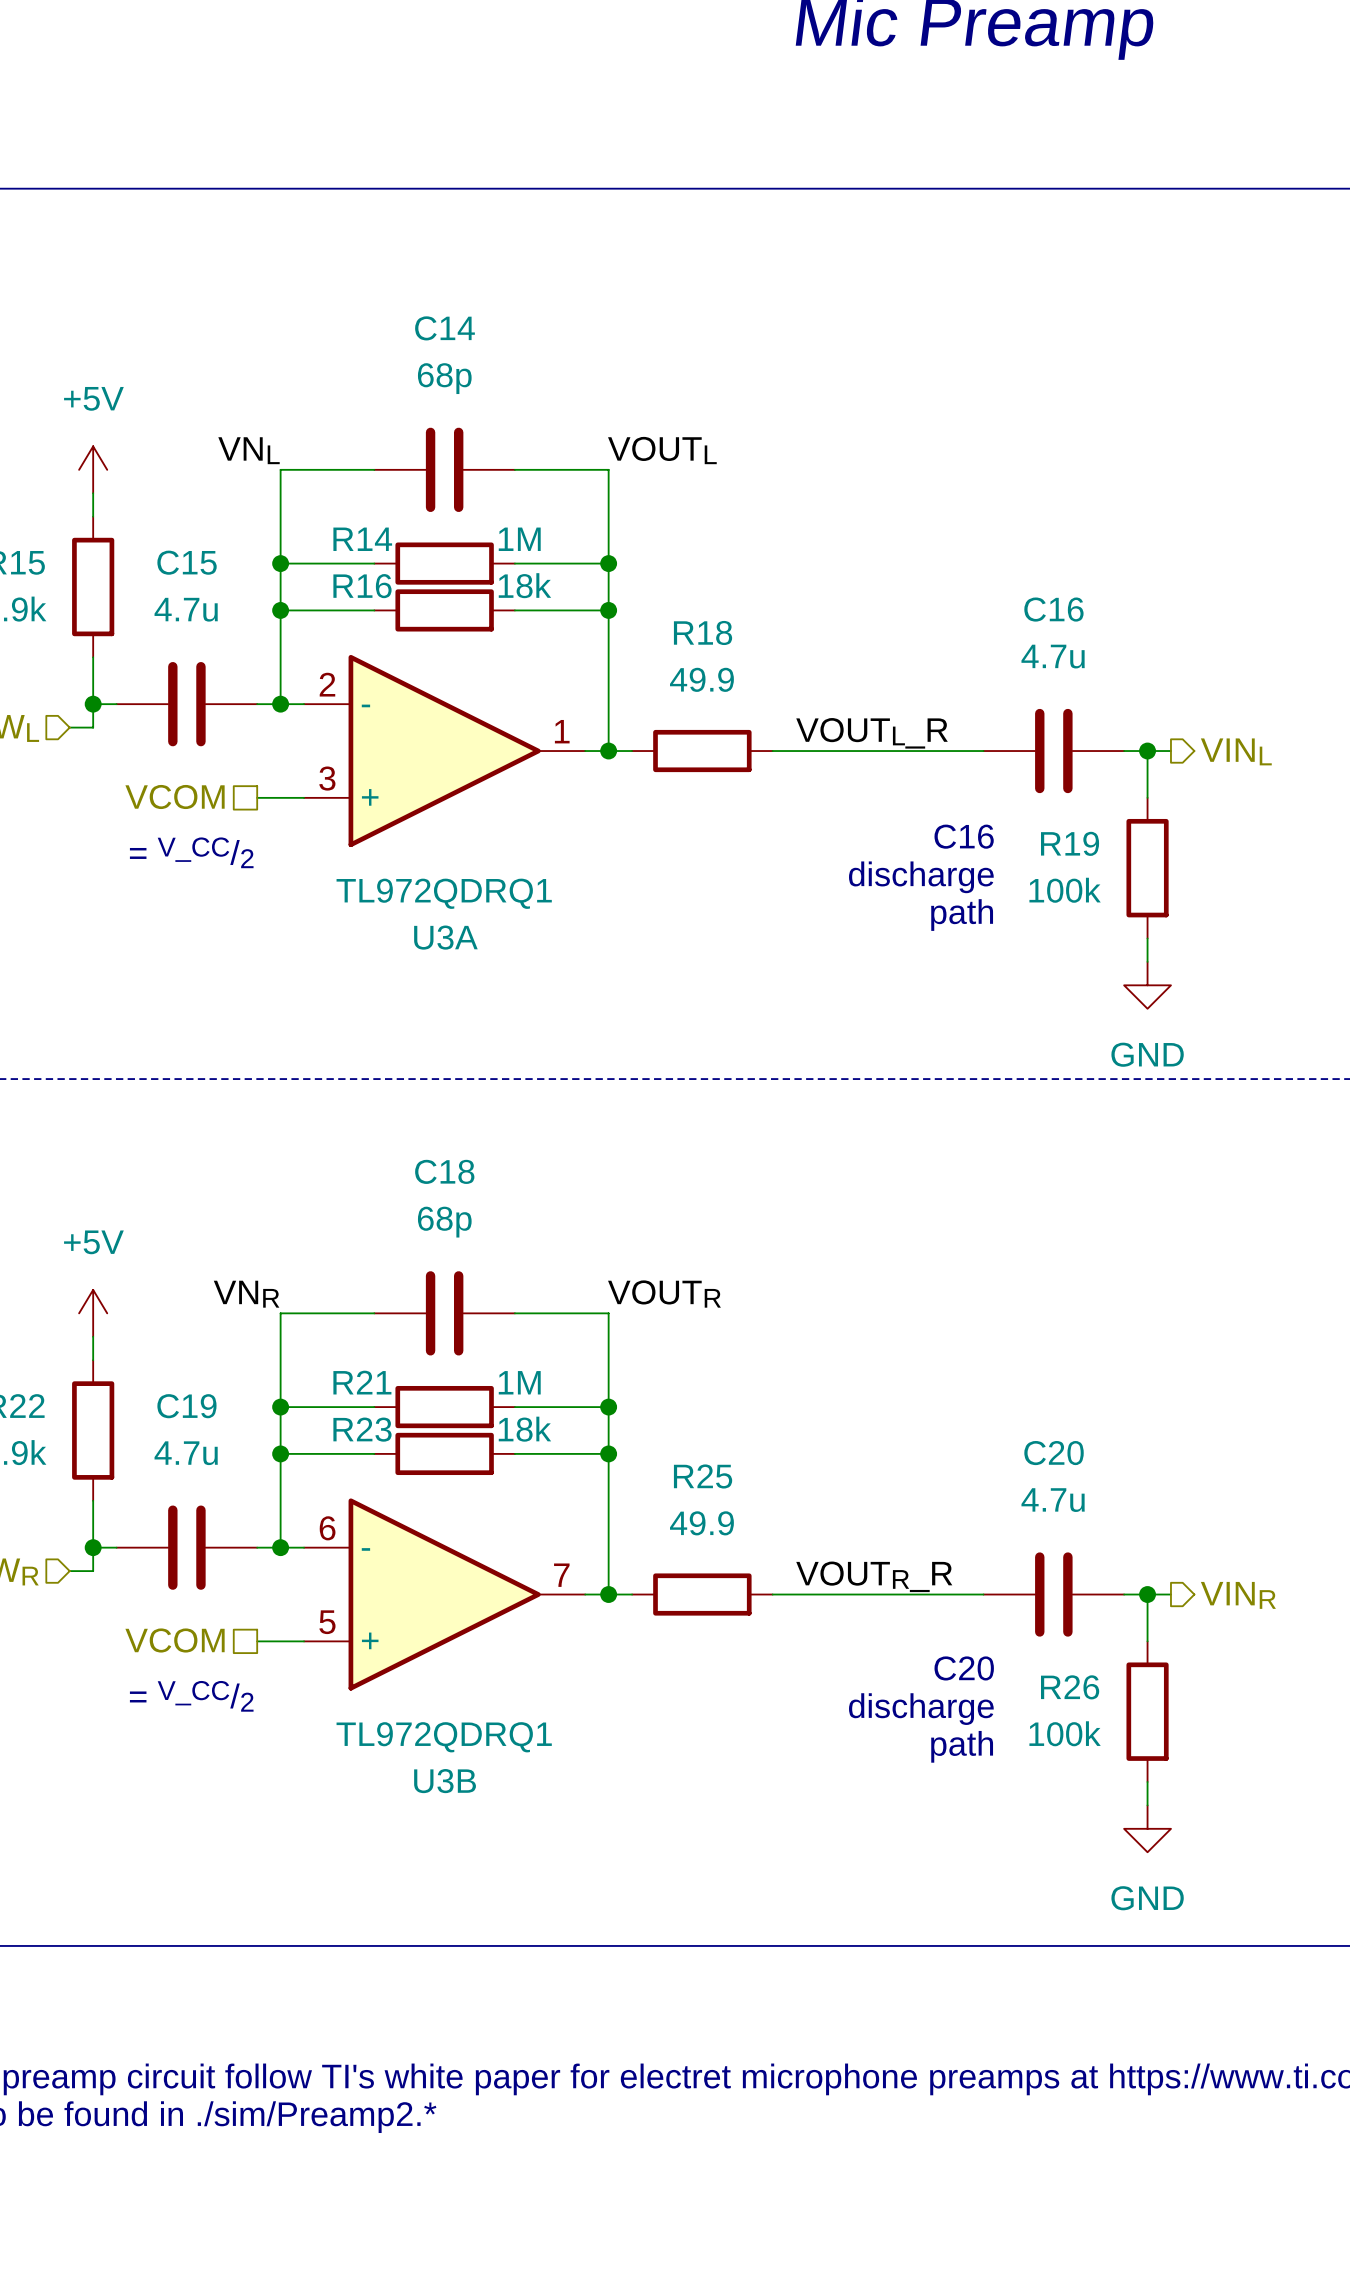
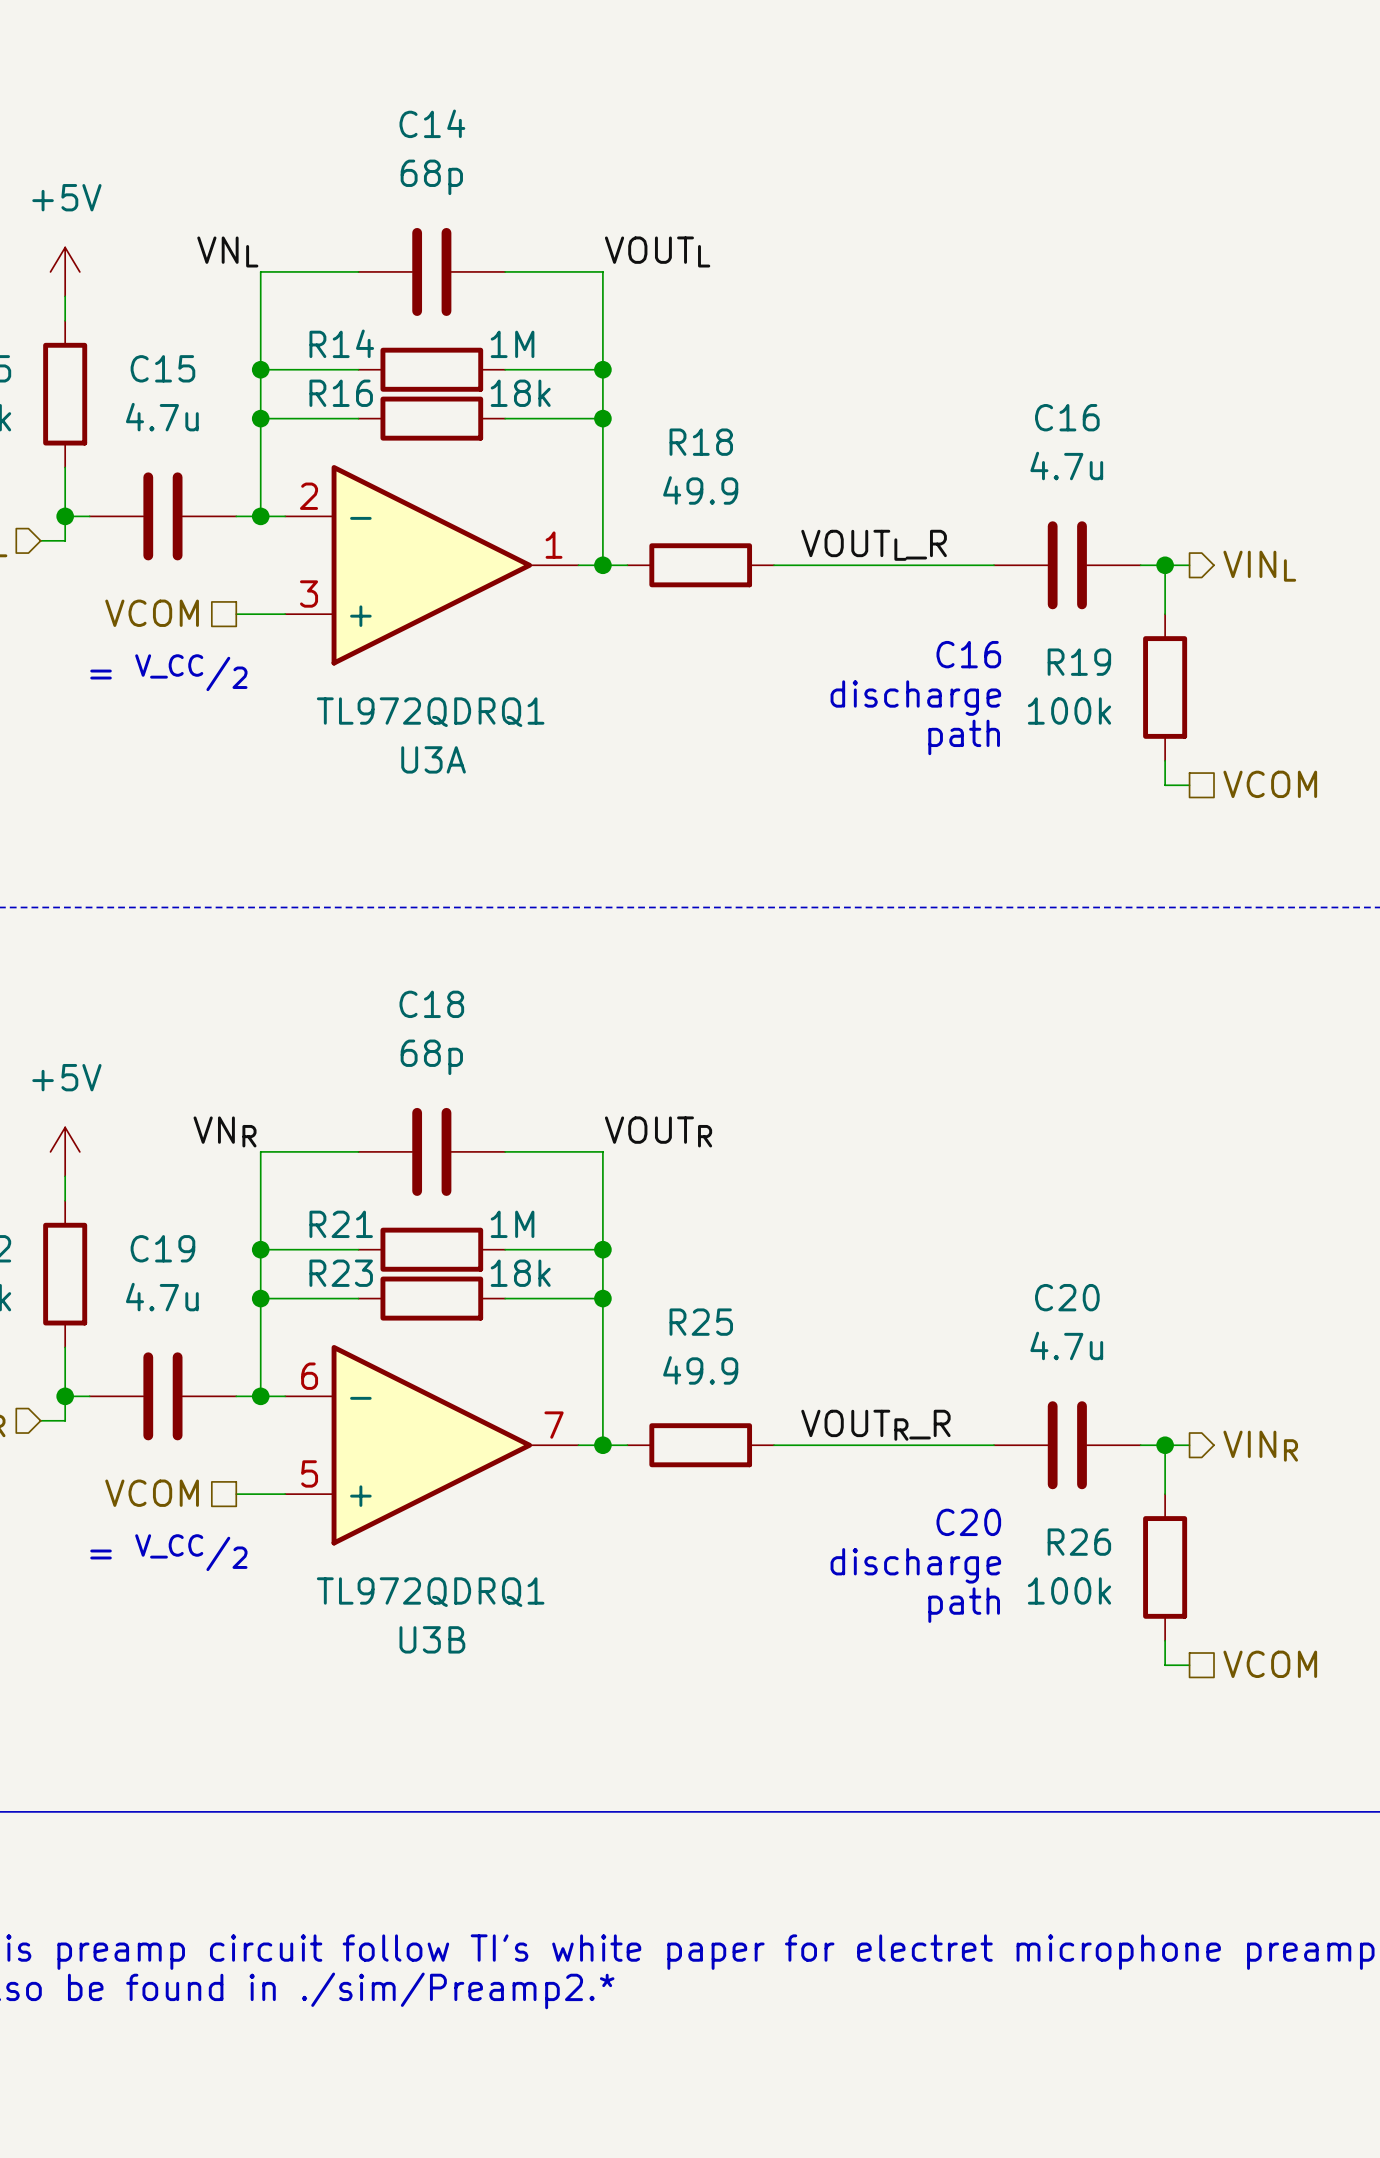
wire: none -> (1165, 785) (1189, 785)
hierarchical label: none -> VCOM (1270, 784)
power symbol: GND (1147, 985) -> none
hierarchical label: none -> VCOM (1270, 1664)
wire: none -> (1165, 1665) (1189, 1665)
power symbol: GND (1147, 1828) -> none

